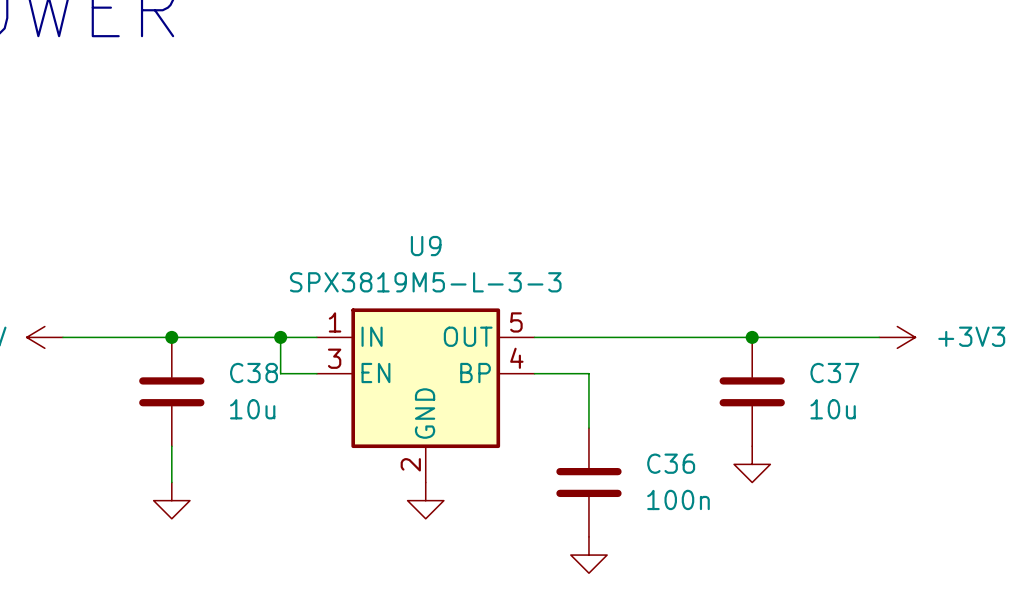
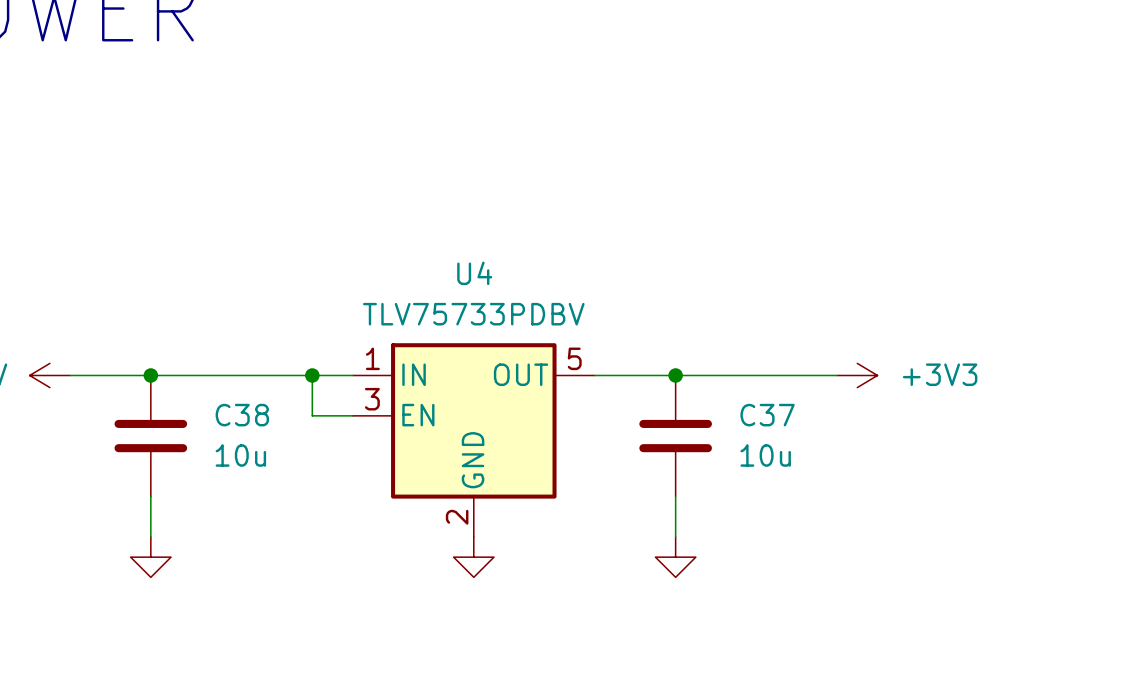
junction position: (171, 337) -> (150, 375)
junction: none -> (675, 375)
wire: (752, 337) (879, 337) -> none
junction: (752, 337) -> none
power symbol position: +3V3 (897, 337) -> +3V3 (857, 375)
wire: (534, 373) (588, 373) (588, 428) -> none
C38 position: (171, 391) -> (150, 436)
C37 position: (752, 391) -> (675, 436)
U9: SPX3819M5-L-3-3 (425, 395) -> none
U4: none -> TLV75733PDBV (473, 440)
wire: (171, 446) (171, 482) -> (150, 496) (150, 536)
wire: none -> (675, 496) (675, 536)
power symbol: (752, 464) -> none
C36: 100n (588, 482) -> none
power symbol position: (171, 500) -> (150, 557)
power symbol position: (588, 555) -> (675, 557)

